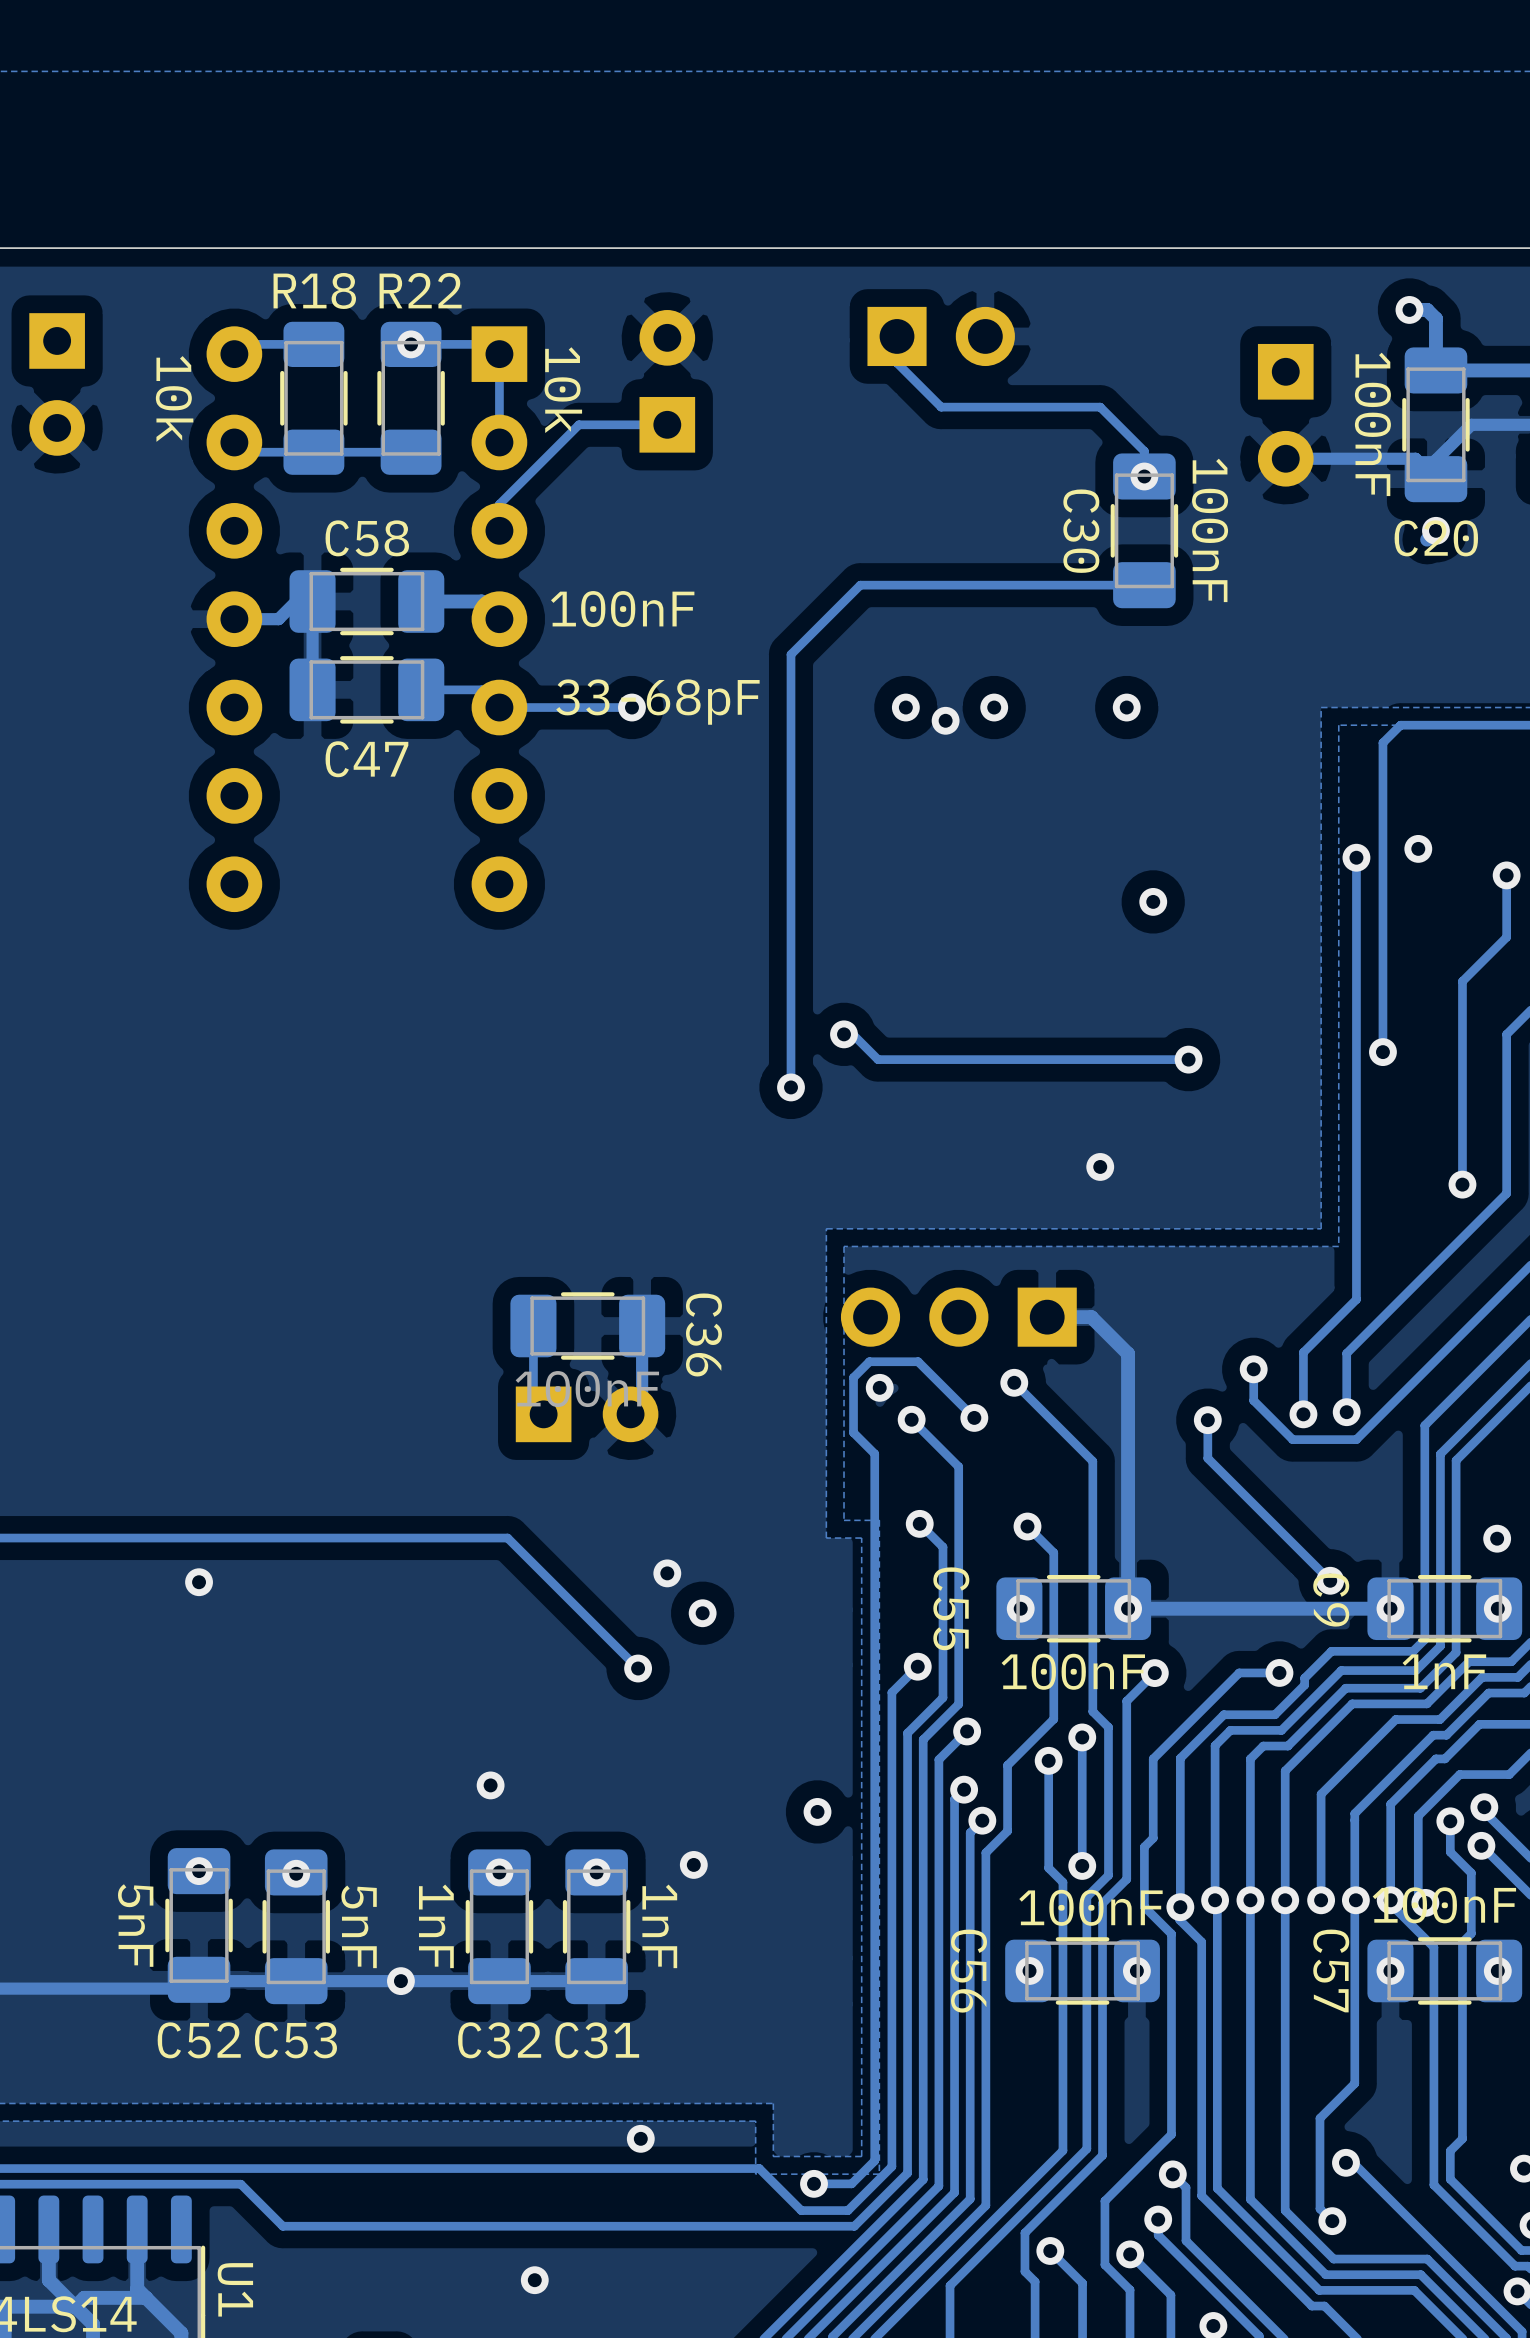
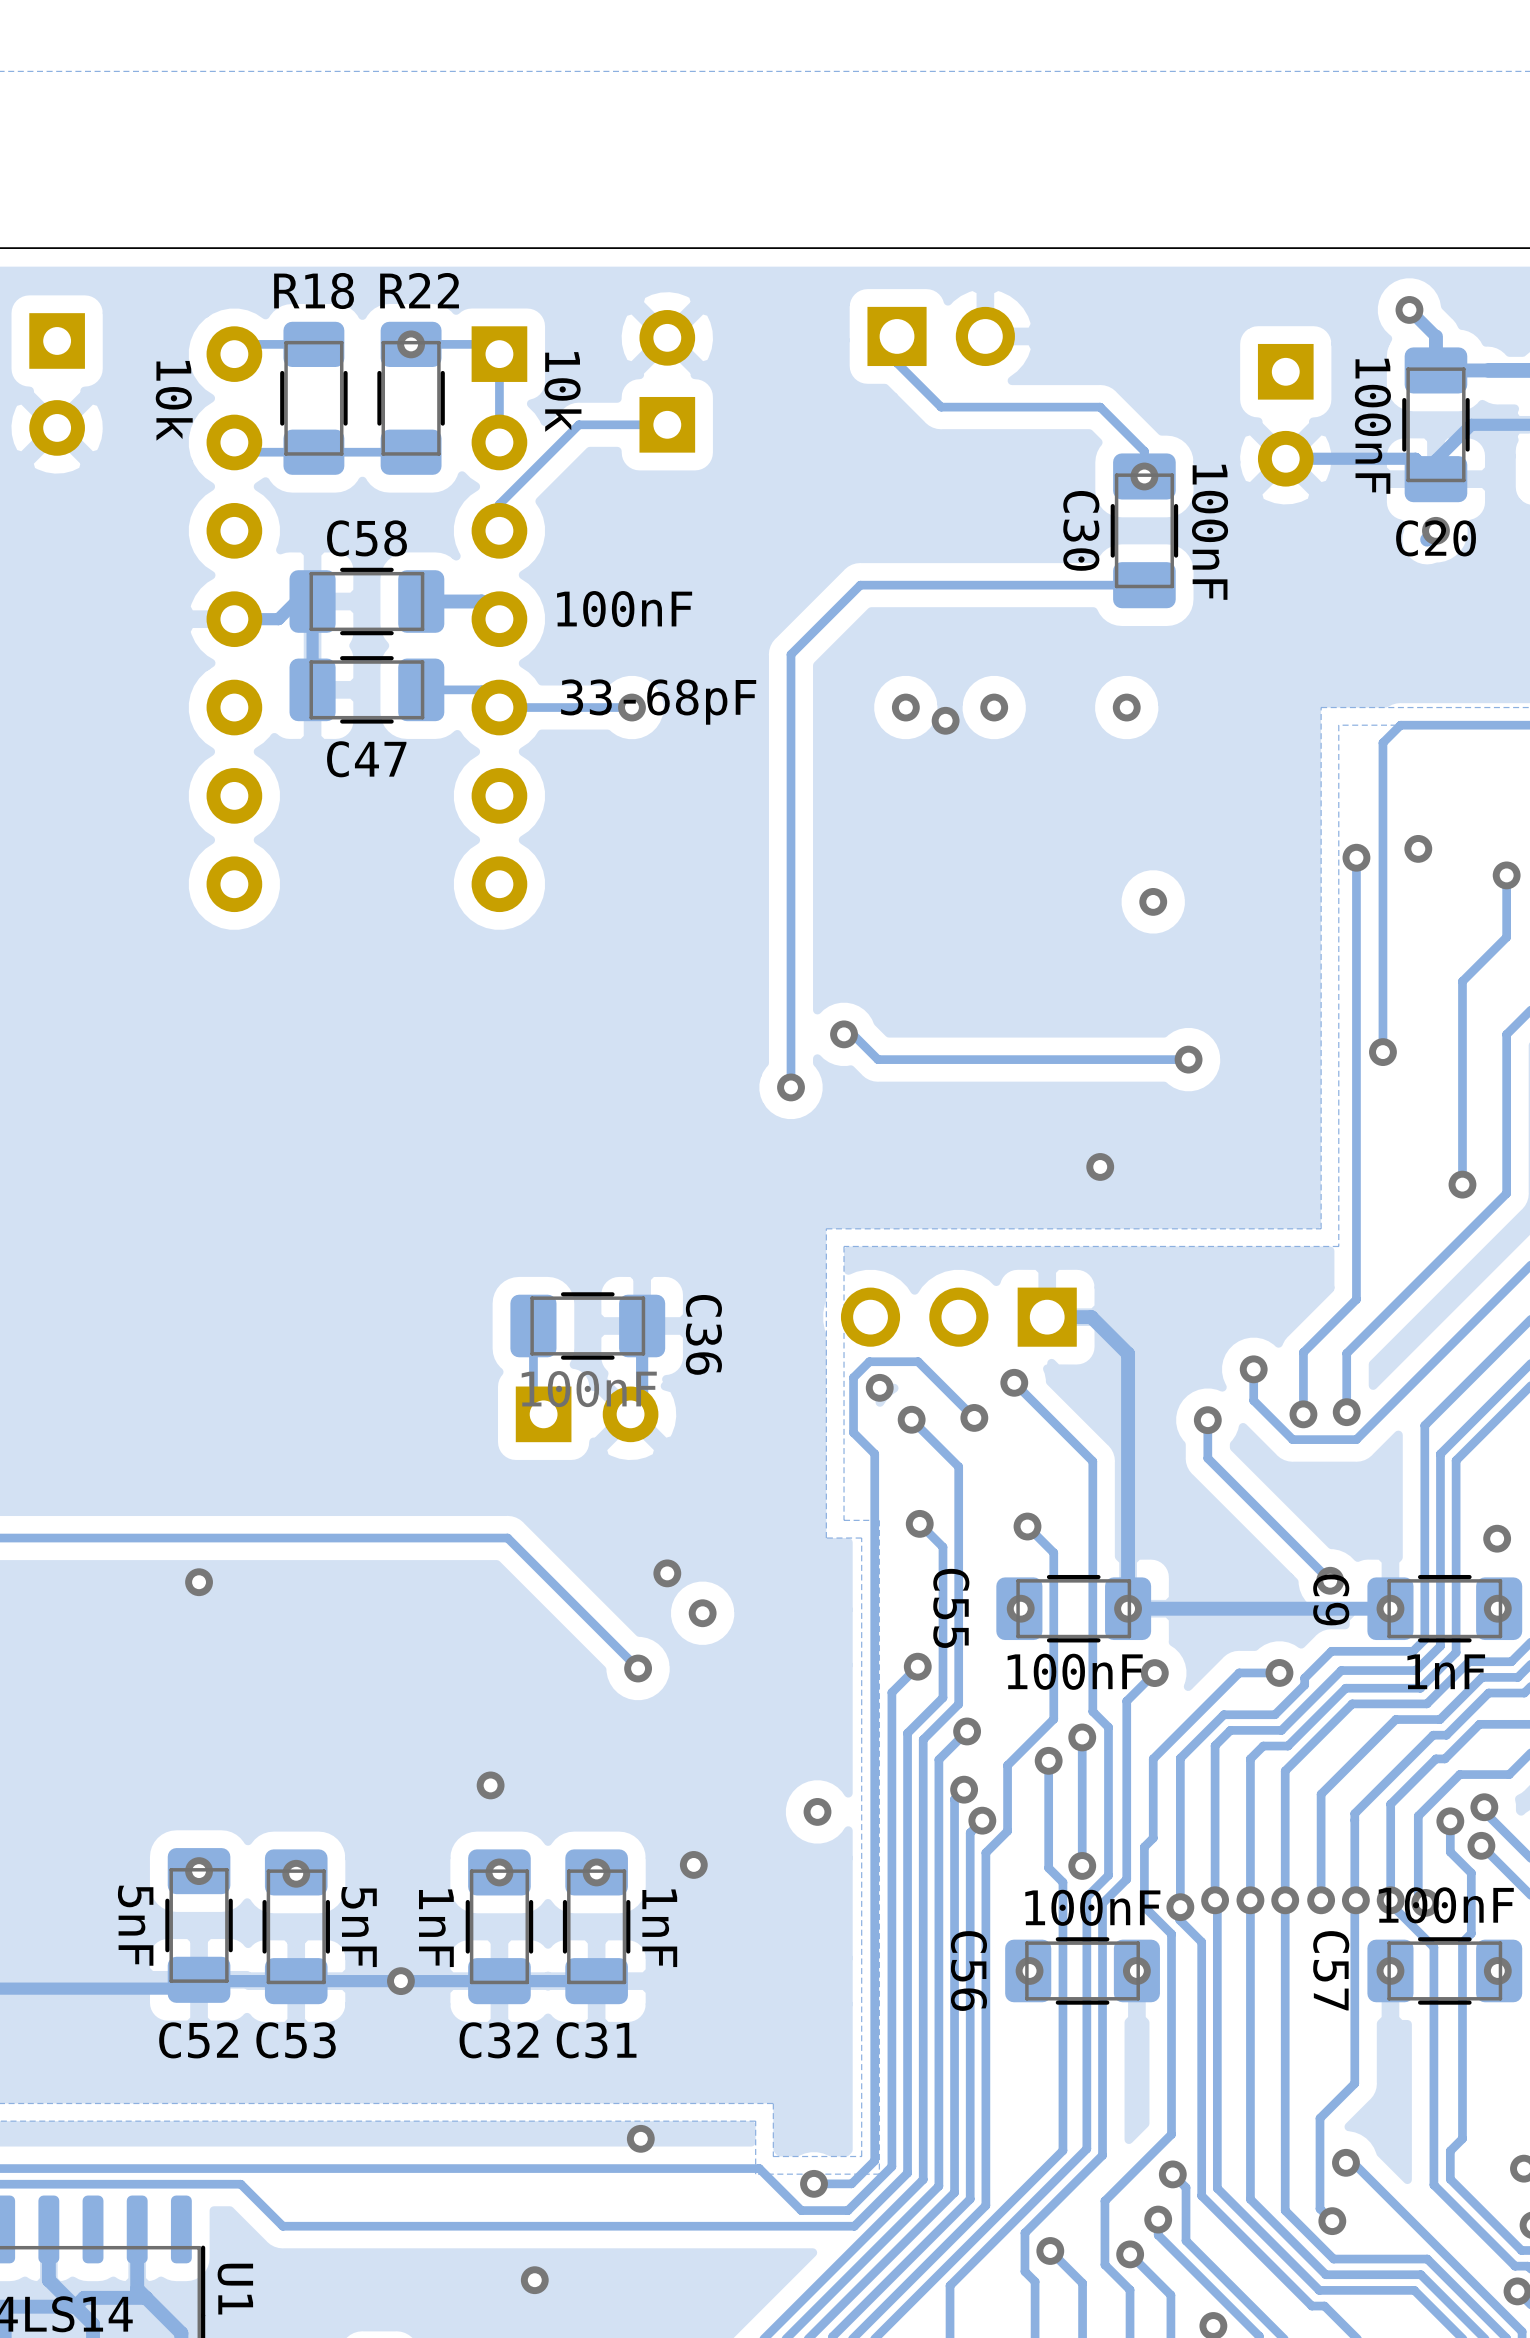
track: (1409, 309) (1427, 309) (1435, 318) (1435, 336) -> (1409, 309) (1435, 336)

